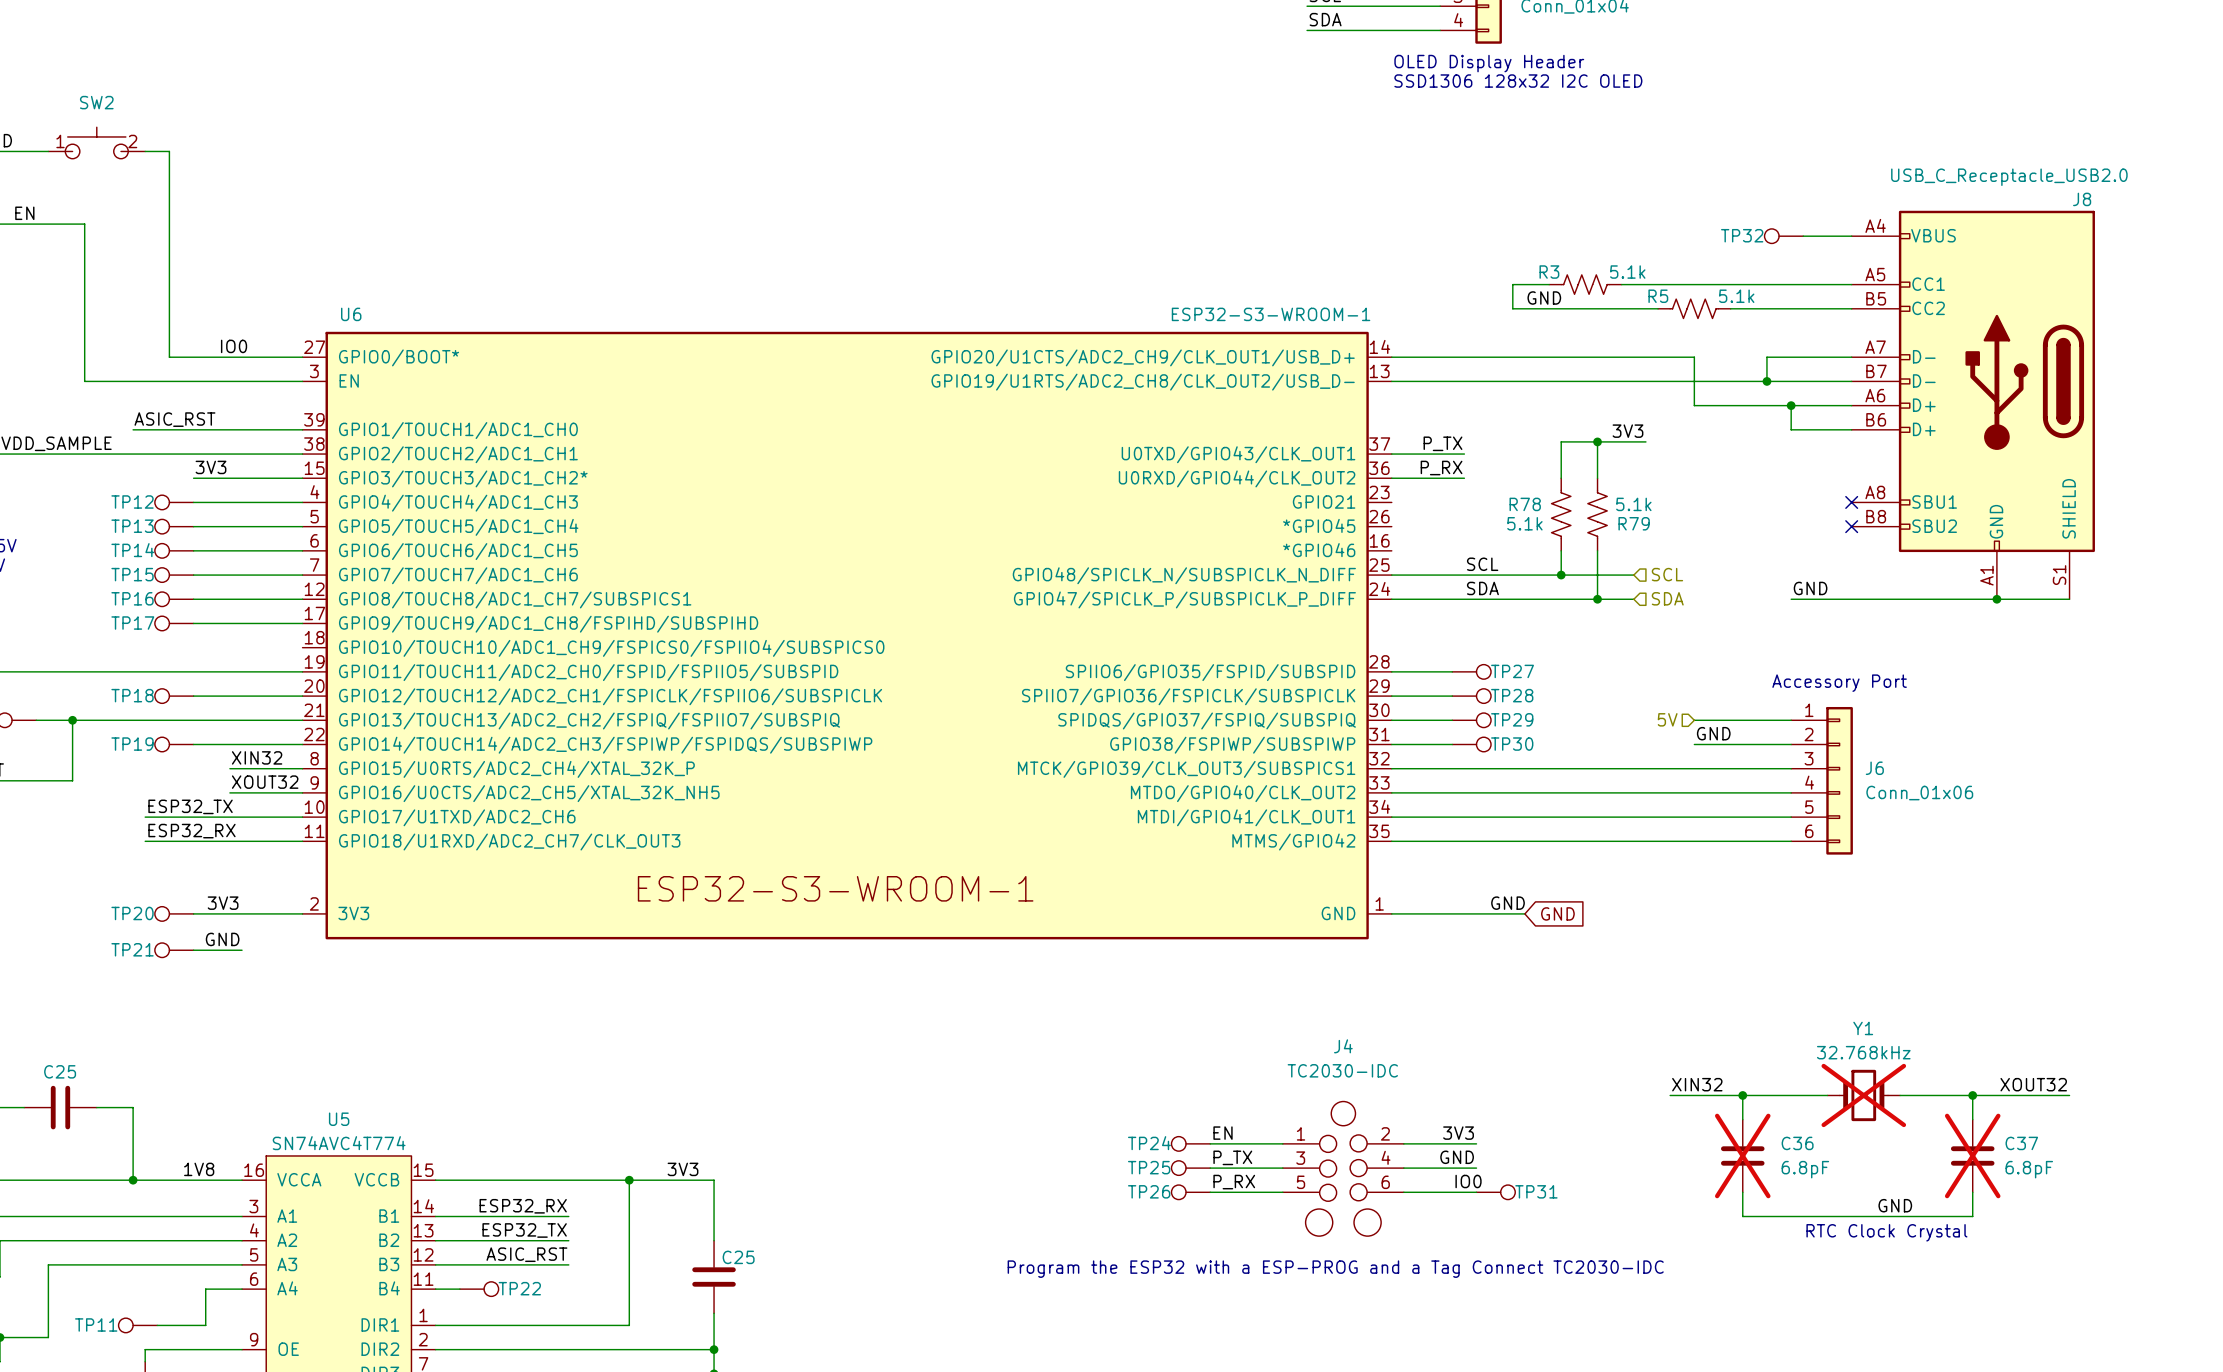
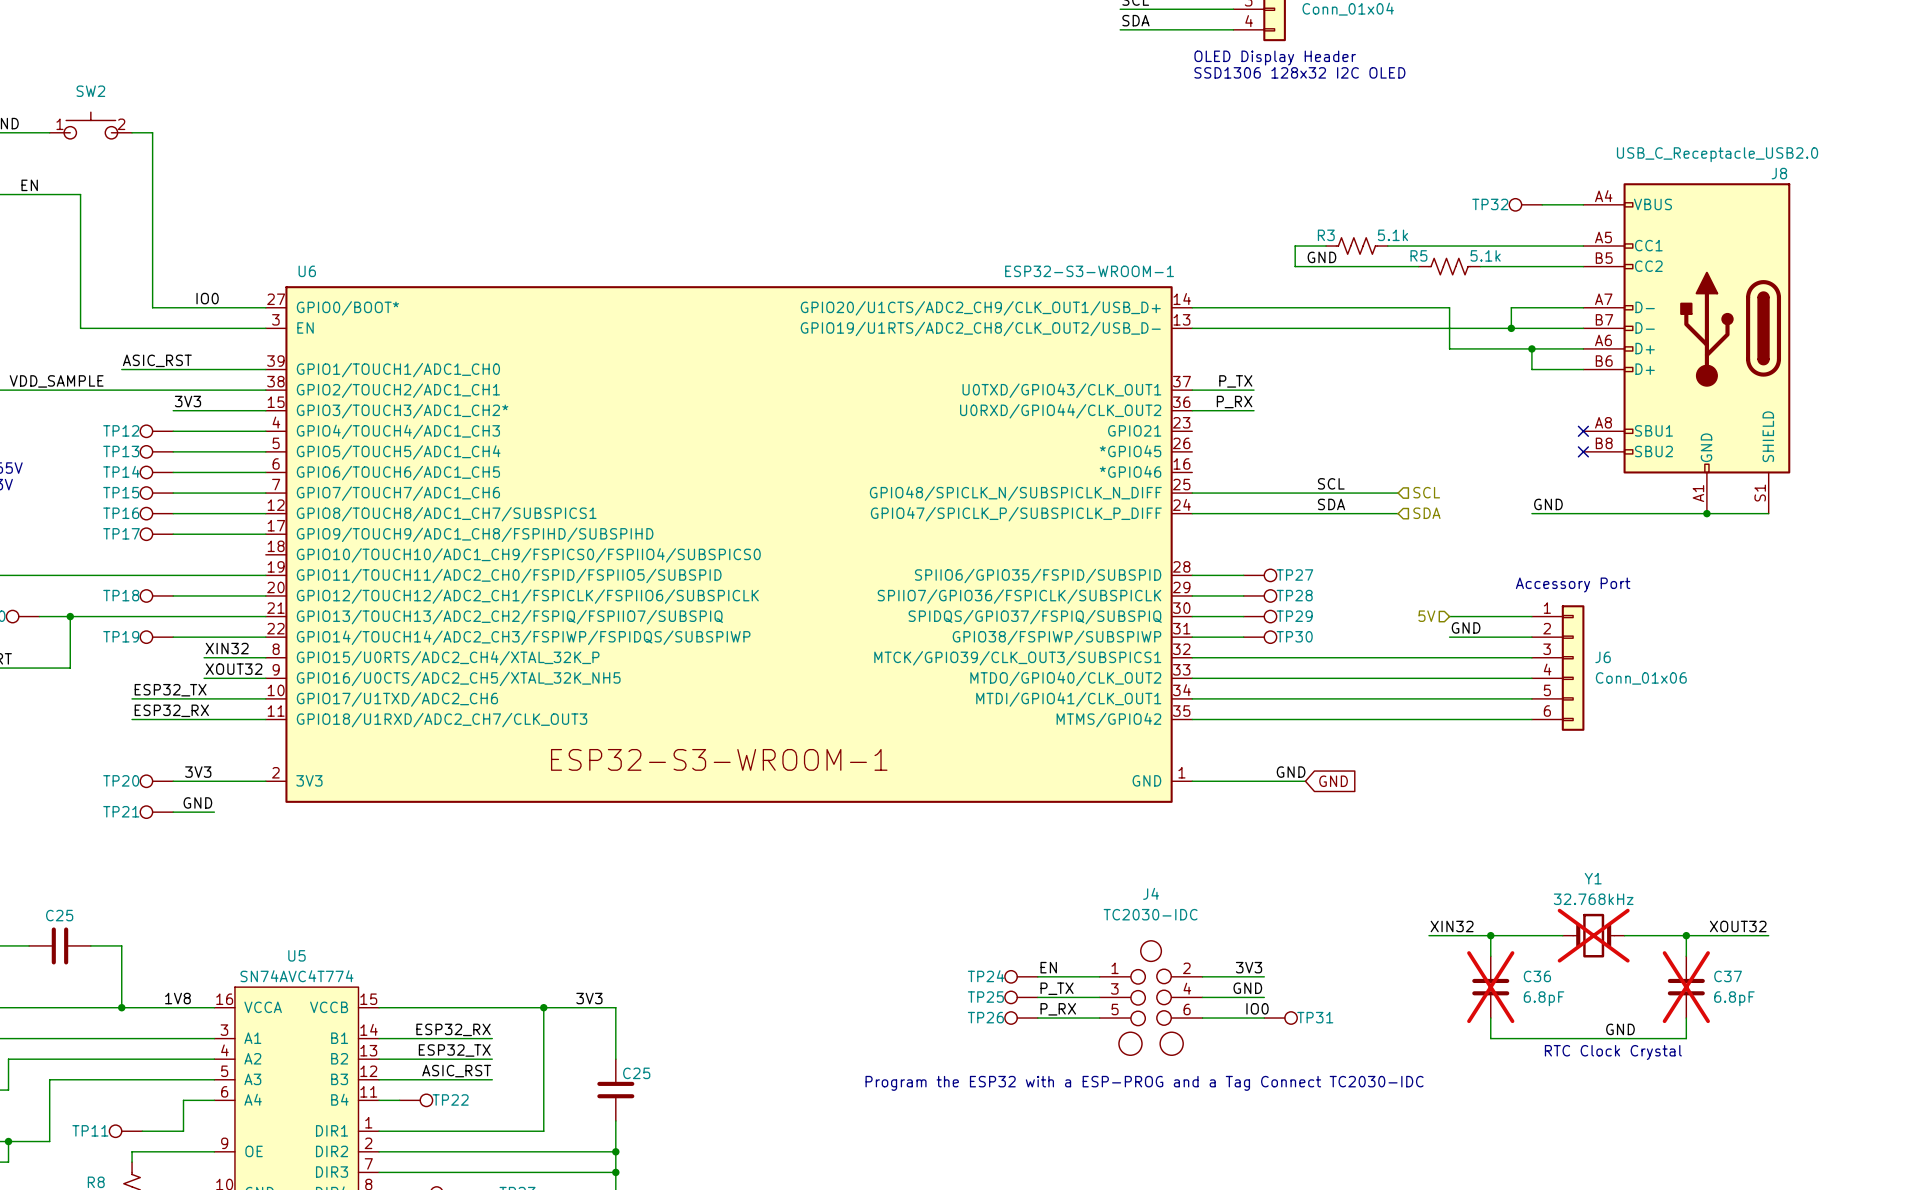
label: 3V3 (1627, 431) -> none
wire: (1597, 441) (1597, 478) -> none
junction: (1597, 441) -> none
wire: (1645, 441) (1561, 441) (1561, 478) -> none
R78: 5.1k (1561, 514) -> none
R79: 5.1k (1597, 514) -> none
wire: (1561, 550) (1561, 575) -> none
wire: (1597, 550) (1597, 599) -> none
label position: SCL (1482, 564) -> SCL (1331, 483)
junction: (1561, 575) -> none
label position: SDA (1482, 588) -> SDA (1331, 504)
junction: (1597, 599) -> none

